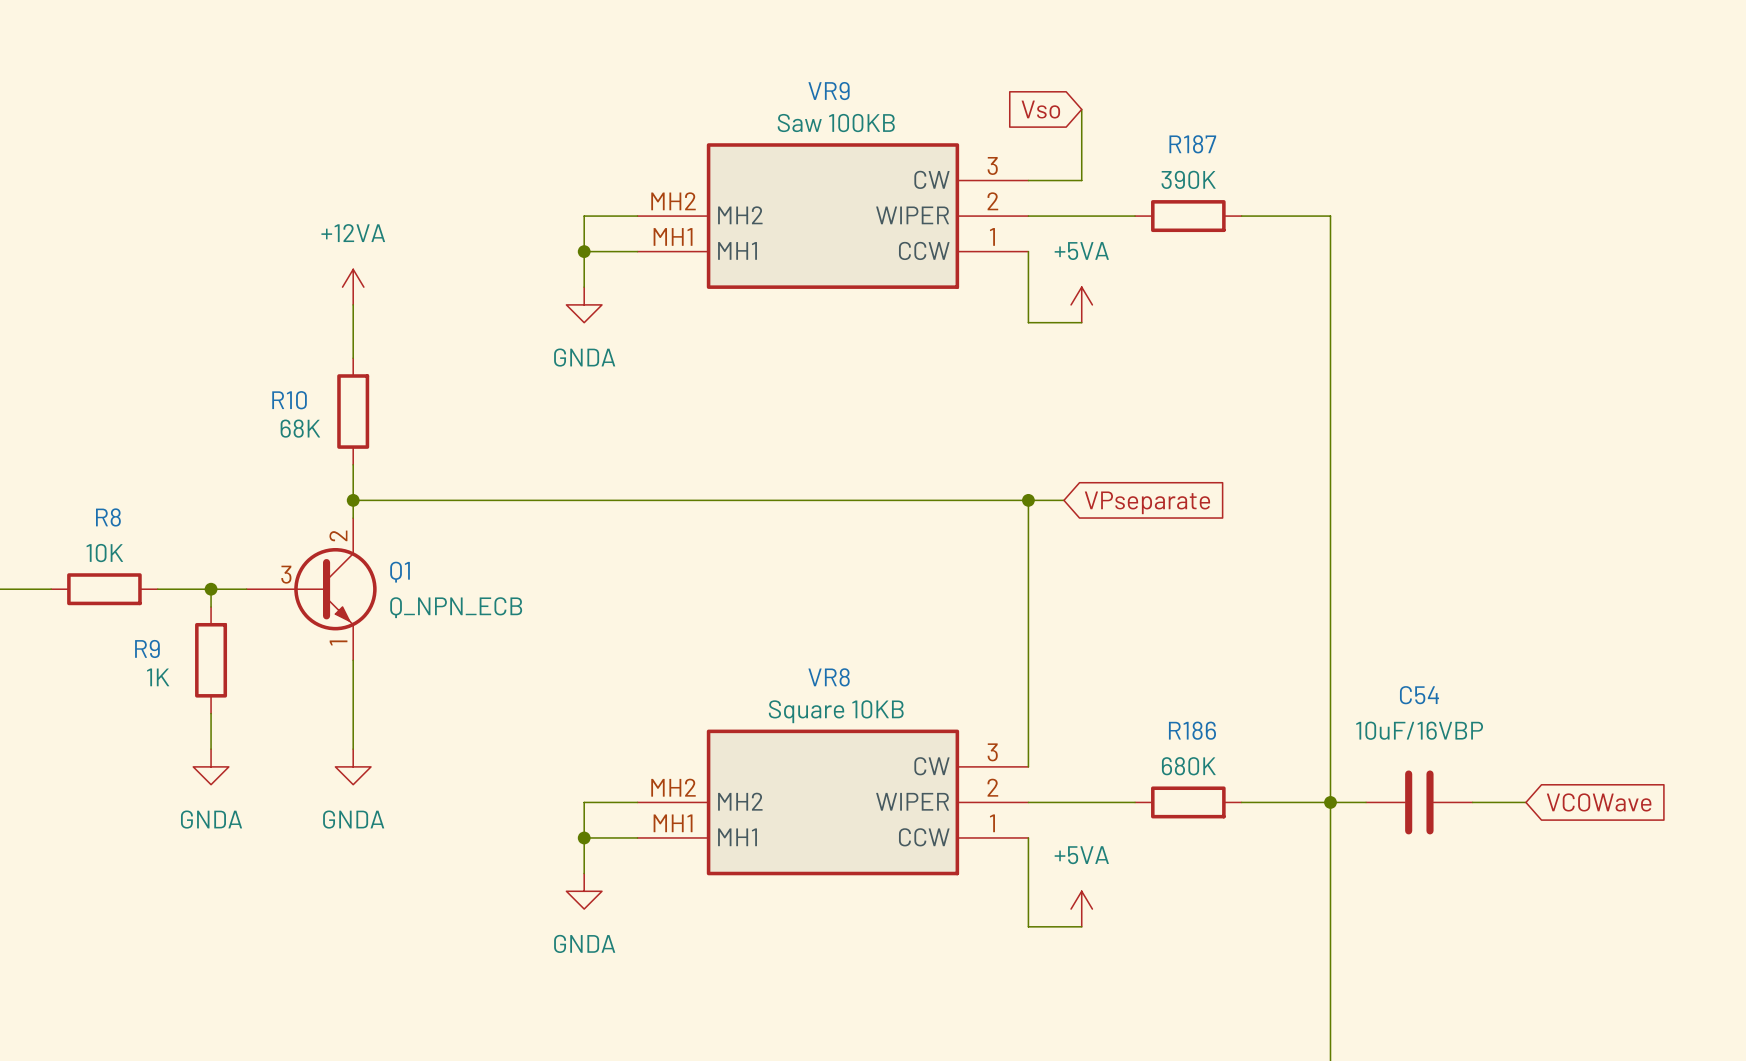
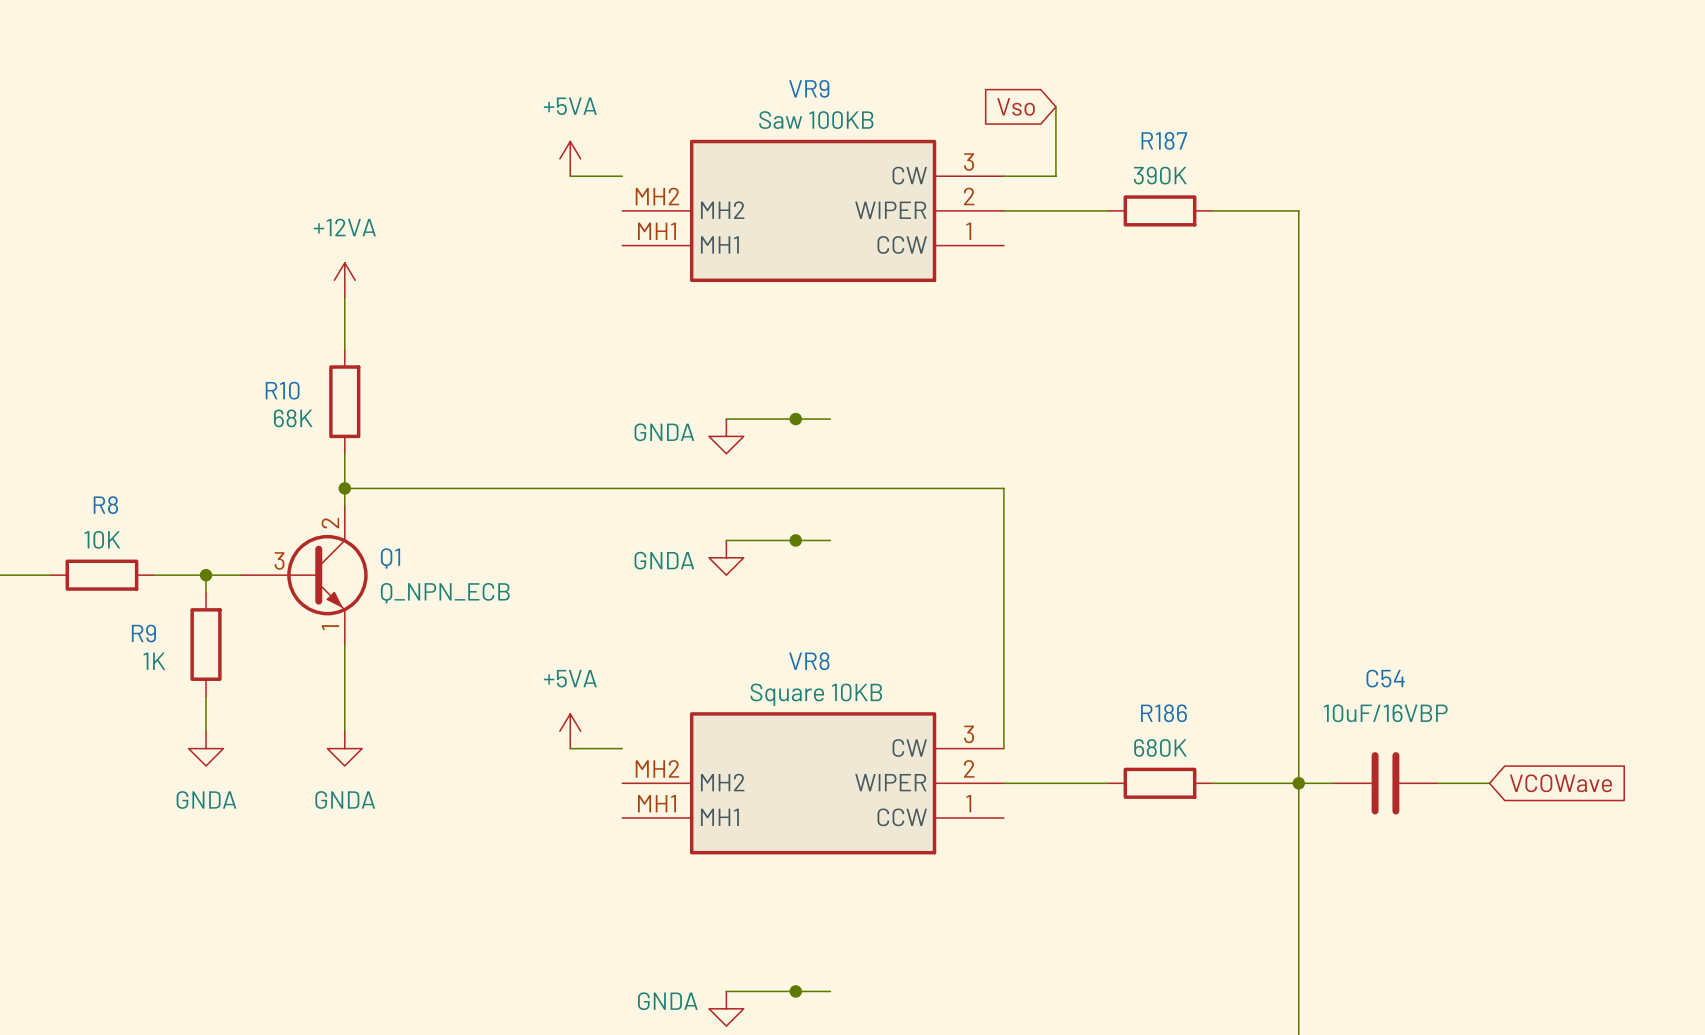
power symbol: none -> +5VA (570, 158)
wire: (637, 216) (584, 216) (584, 287) -> none
wire: (584, 251) (637, 251) -> (570, 176) (622, 176)
junction: (584, 251) -> none
wire: (1028, 251) (1028, 322) (1081, 322) -> none
power symbol: GNDA (584, 304) -> none
power symbol: +5VA (1081, 304) -> none
wire: none -> (726, 419) (830, 419)
junction: none -> (795, 419)
power symbol: none -> GNDA (726, 436)
wire: (1028, 500) (1063, 500) -> none
junction: (1028, 500) -> none
global label: VPseparate (1147, 502) -> none
wire: none -> (726, 540) (830, 540)
junction: none -> (795, 540)
power symbol: none -> GNDA (726, 557)
power symbol: none -> +5VA (570, 731)
wire: (637, 802) (584, 802) (584, 873) -> none
wire: (584, 837) (637, 837) -> (570, 748) (622, 748)
junction: (584, 837) -> none
wire: (1028, 837) (1028, 926) (1081, 926) -> none
power symbol: GNDA (584, 891) -> none
power symbol: +5VA (1081, 909) -> none
wire: none -> (726, 991) (830, 991)
junction: none -> (795, 991)
power symbol: none -> GNDA (726, 1008)

